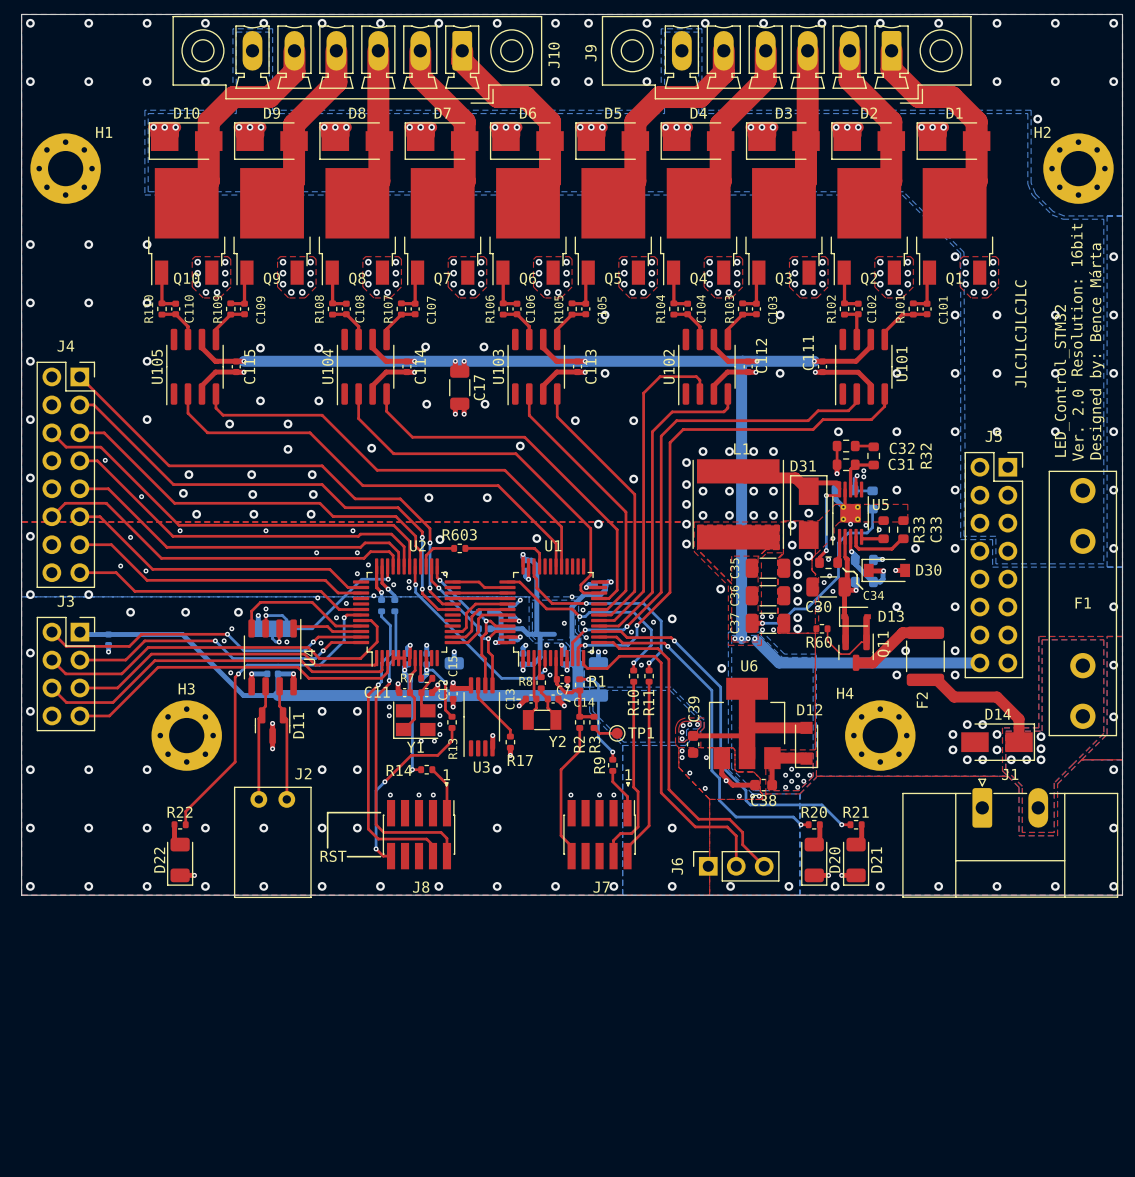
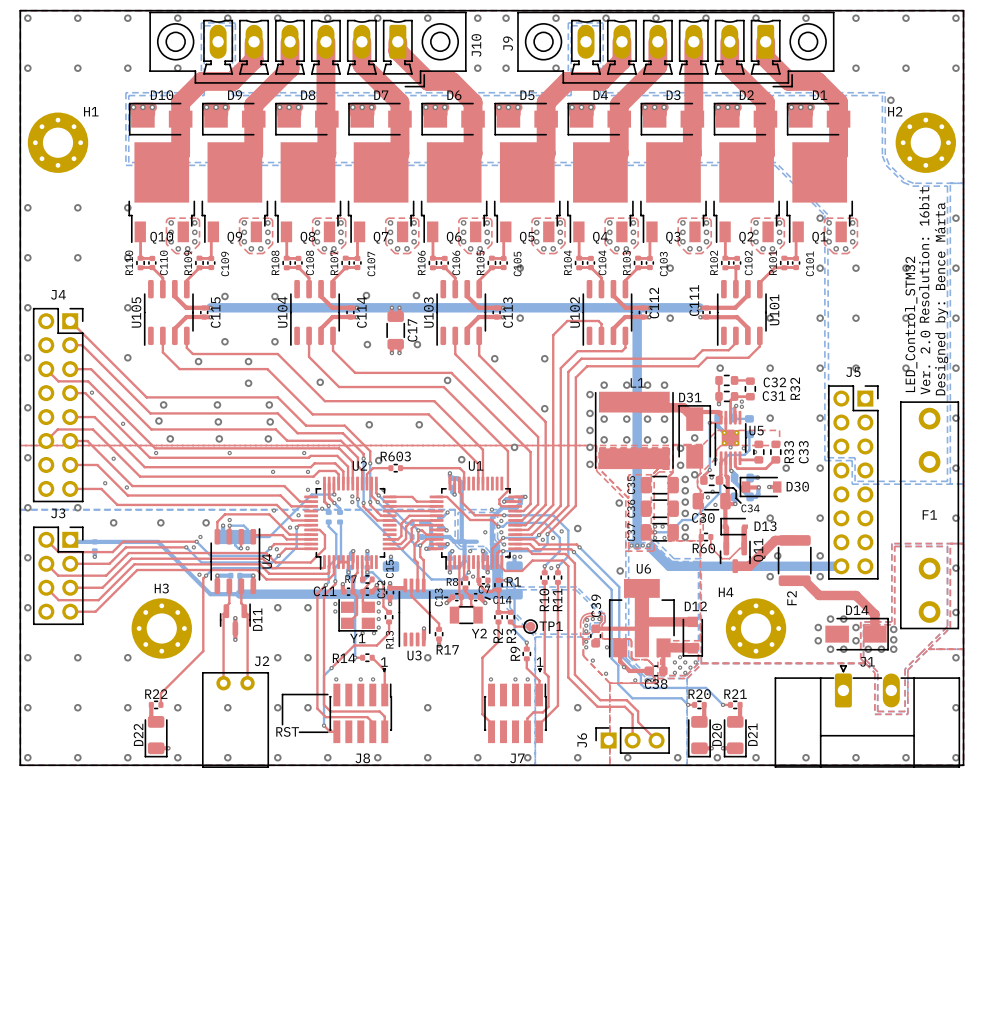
text: JLCJLCJLCJLC (1020, 333) -> none

